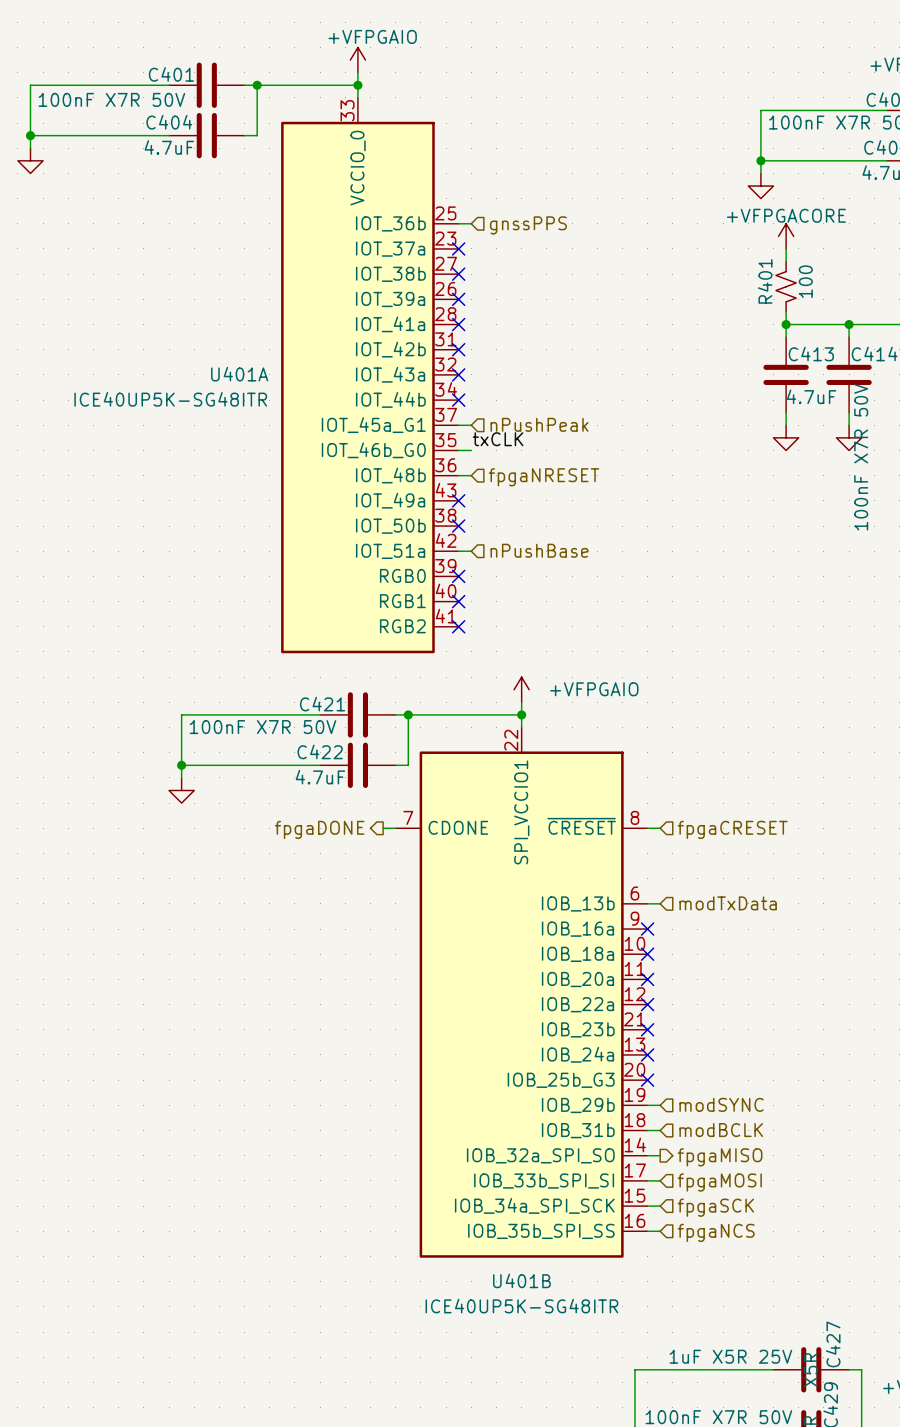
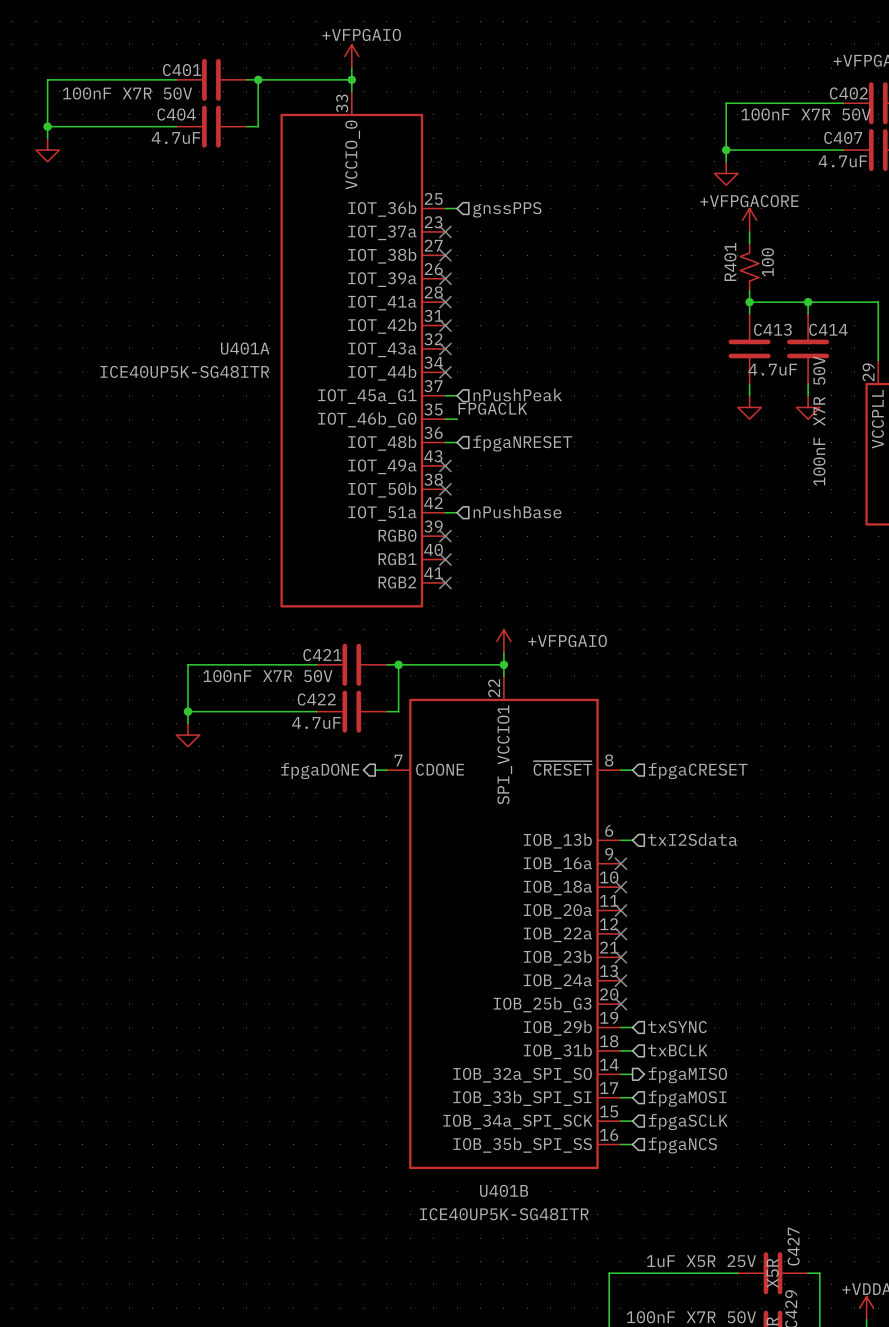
label: txCLK (498, 439) -> FPGACLK (492, 408)
hierarchical label: modTxData (728, 903) -> txI2Sdata (692, 839)
hierarchical label: modSYNC (721, 1104) -> txSYNC (677, 1027)
hierarchical label: modBCLK (721, 1130) -> txBCLK (677, 1050)
hierarchical label: fpgaSCK (715, 1207) -> fpgaSCLK (688, 1122)

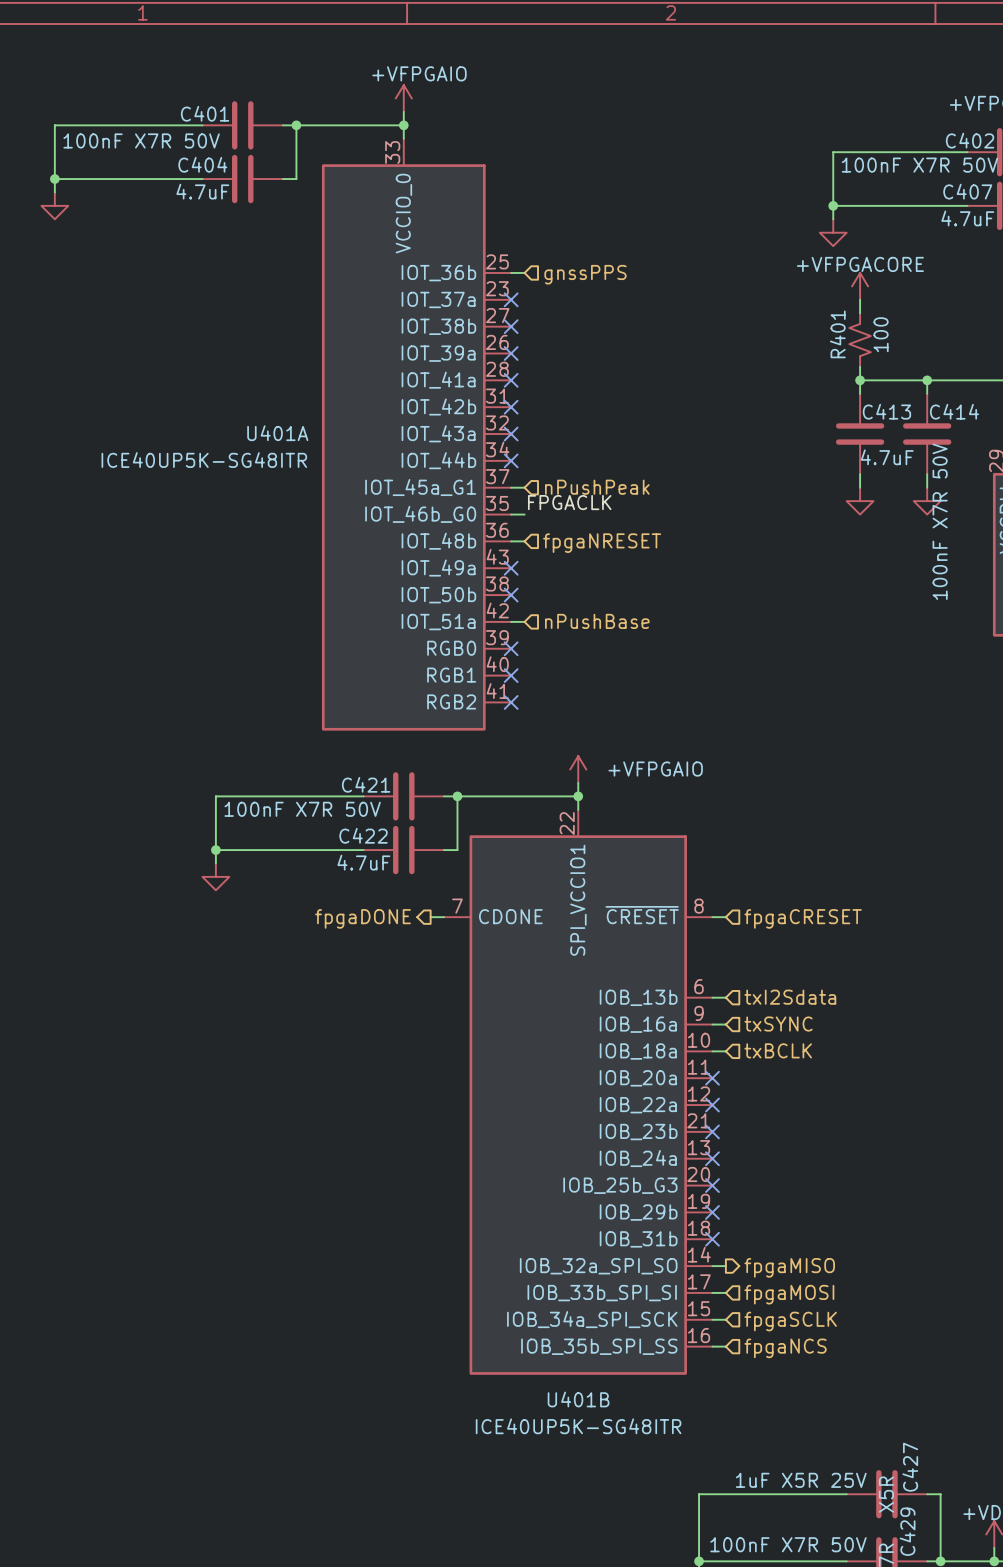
no-connect mark: (620, 863) -> none
no-connect mark: (620, 887) -> none
wire: (620, 1027) (632, 1027) -> (712, 1051) (725, 1051)
no-connect mark: none -> (712, 1212)
hierarchical label position: txSYNC (677, 1027) -> txSYNC (778, 1024)
wire: (620, 1050) (632, 1050) -> (712, 1024) (725, 1024)
no-connect mark: none -> (712, 1239)
hierarchical label position: txBCLK (677, 1050) -> txBCLK (778, 1050)

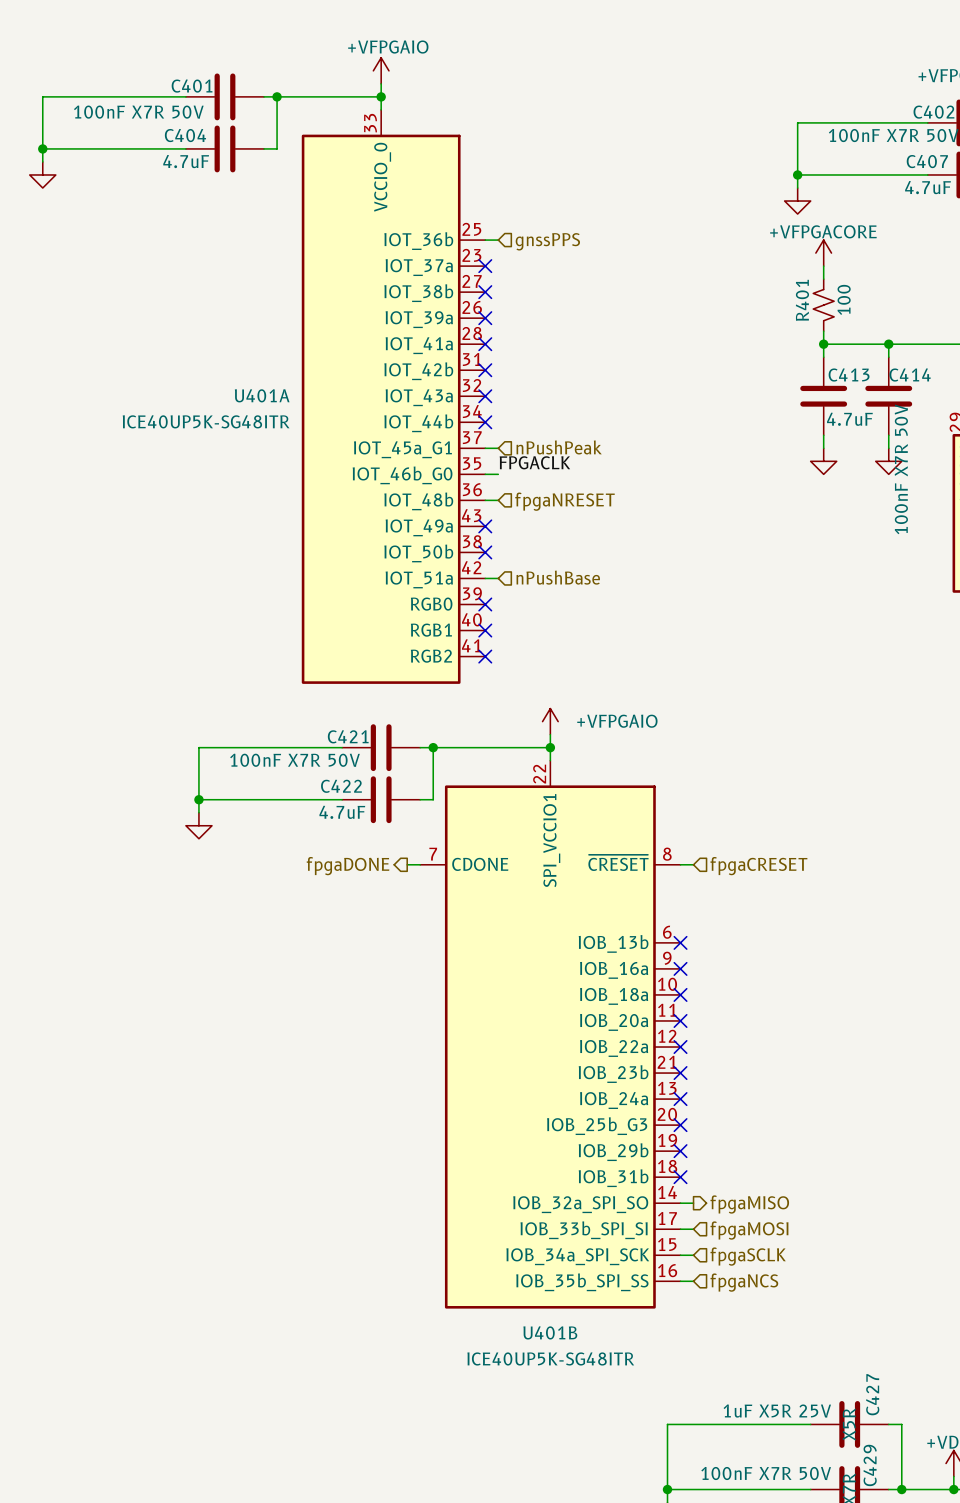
wire: (712, 997) (725, 997) -> none
no-connect mark: none -> (680, 942)
hierarchical label: txI2Sdata (790, 997) -> none
wire: (712, 1024) (725, 1024) -> none
no-connect mark: none -> (680, 968)
hierarchical label: txSYNC (778, 1024) -> none
hierarchical label: txBCLK (778, 1050) -> none
wire: (712, 1051) (725, 1051) -> none
no-connect mark: none -> (680, 994)

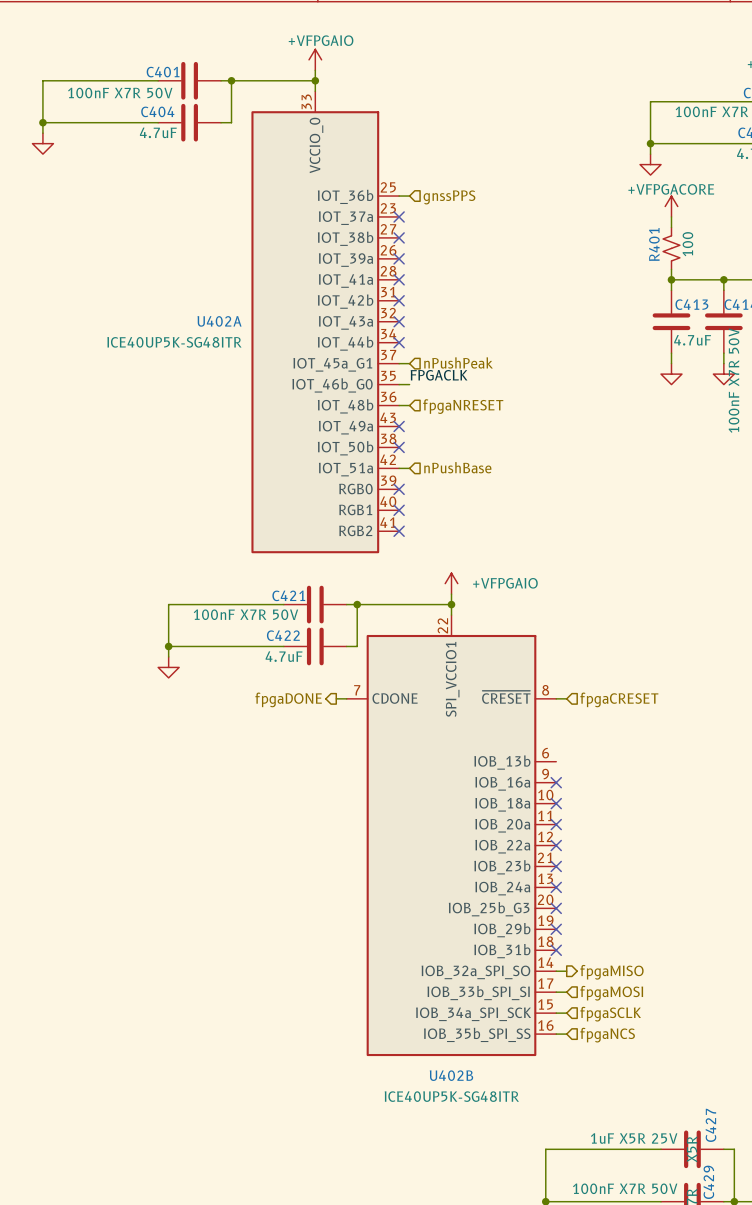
U401A name: U401A (262, 395) -> U402A (219, 321)
no-connect mark: (680, 942) -> none
U401B name: U401B (550, 1332) -> U402B (451, 1075)

